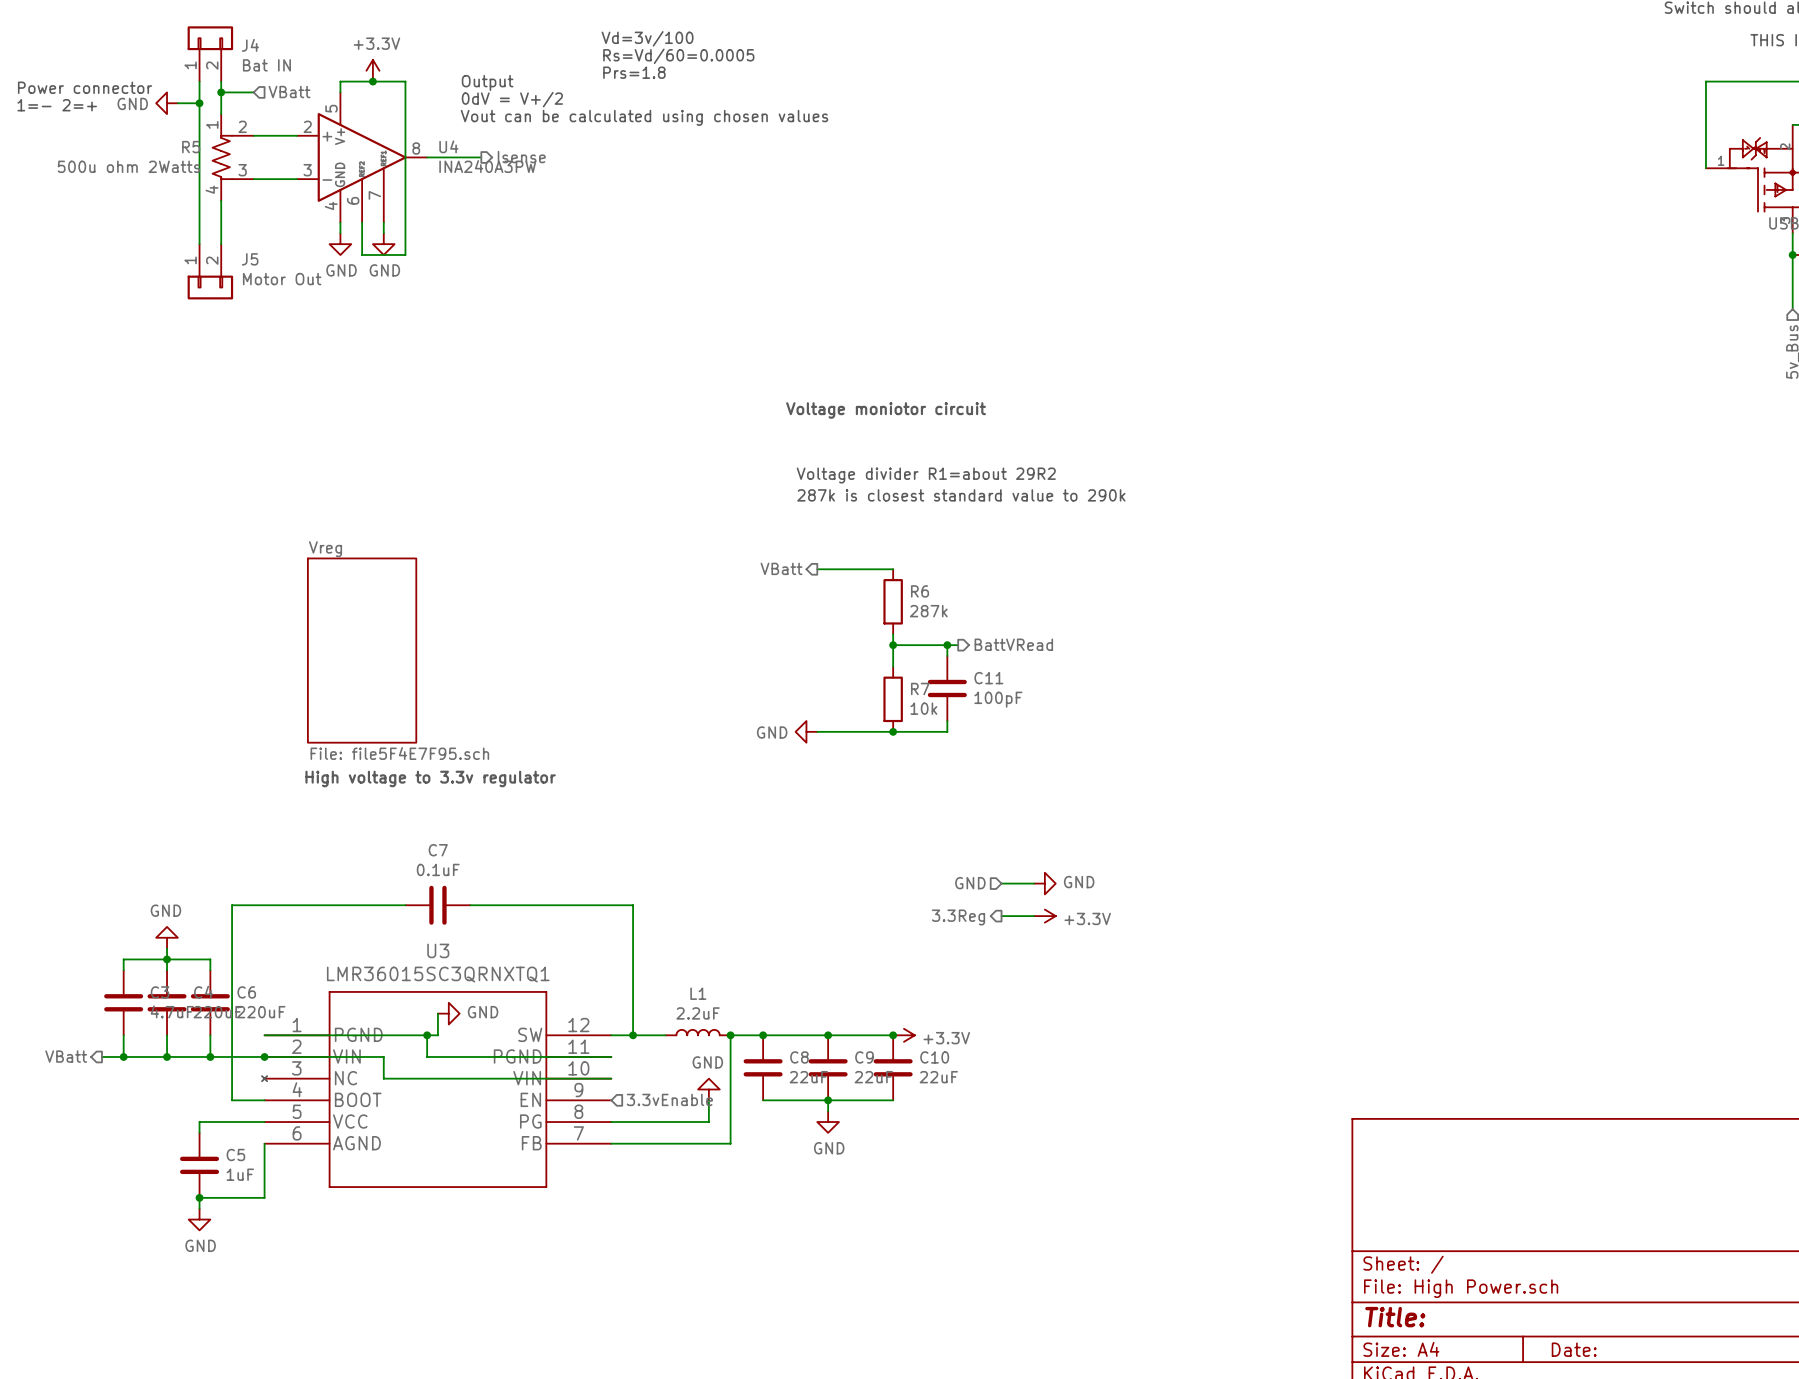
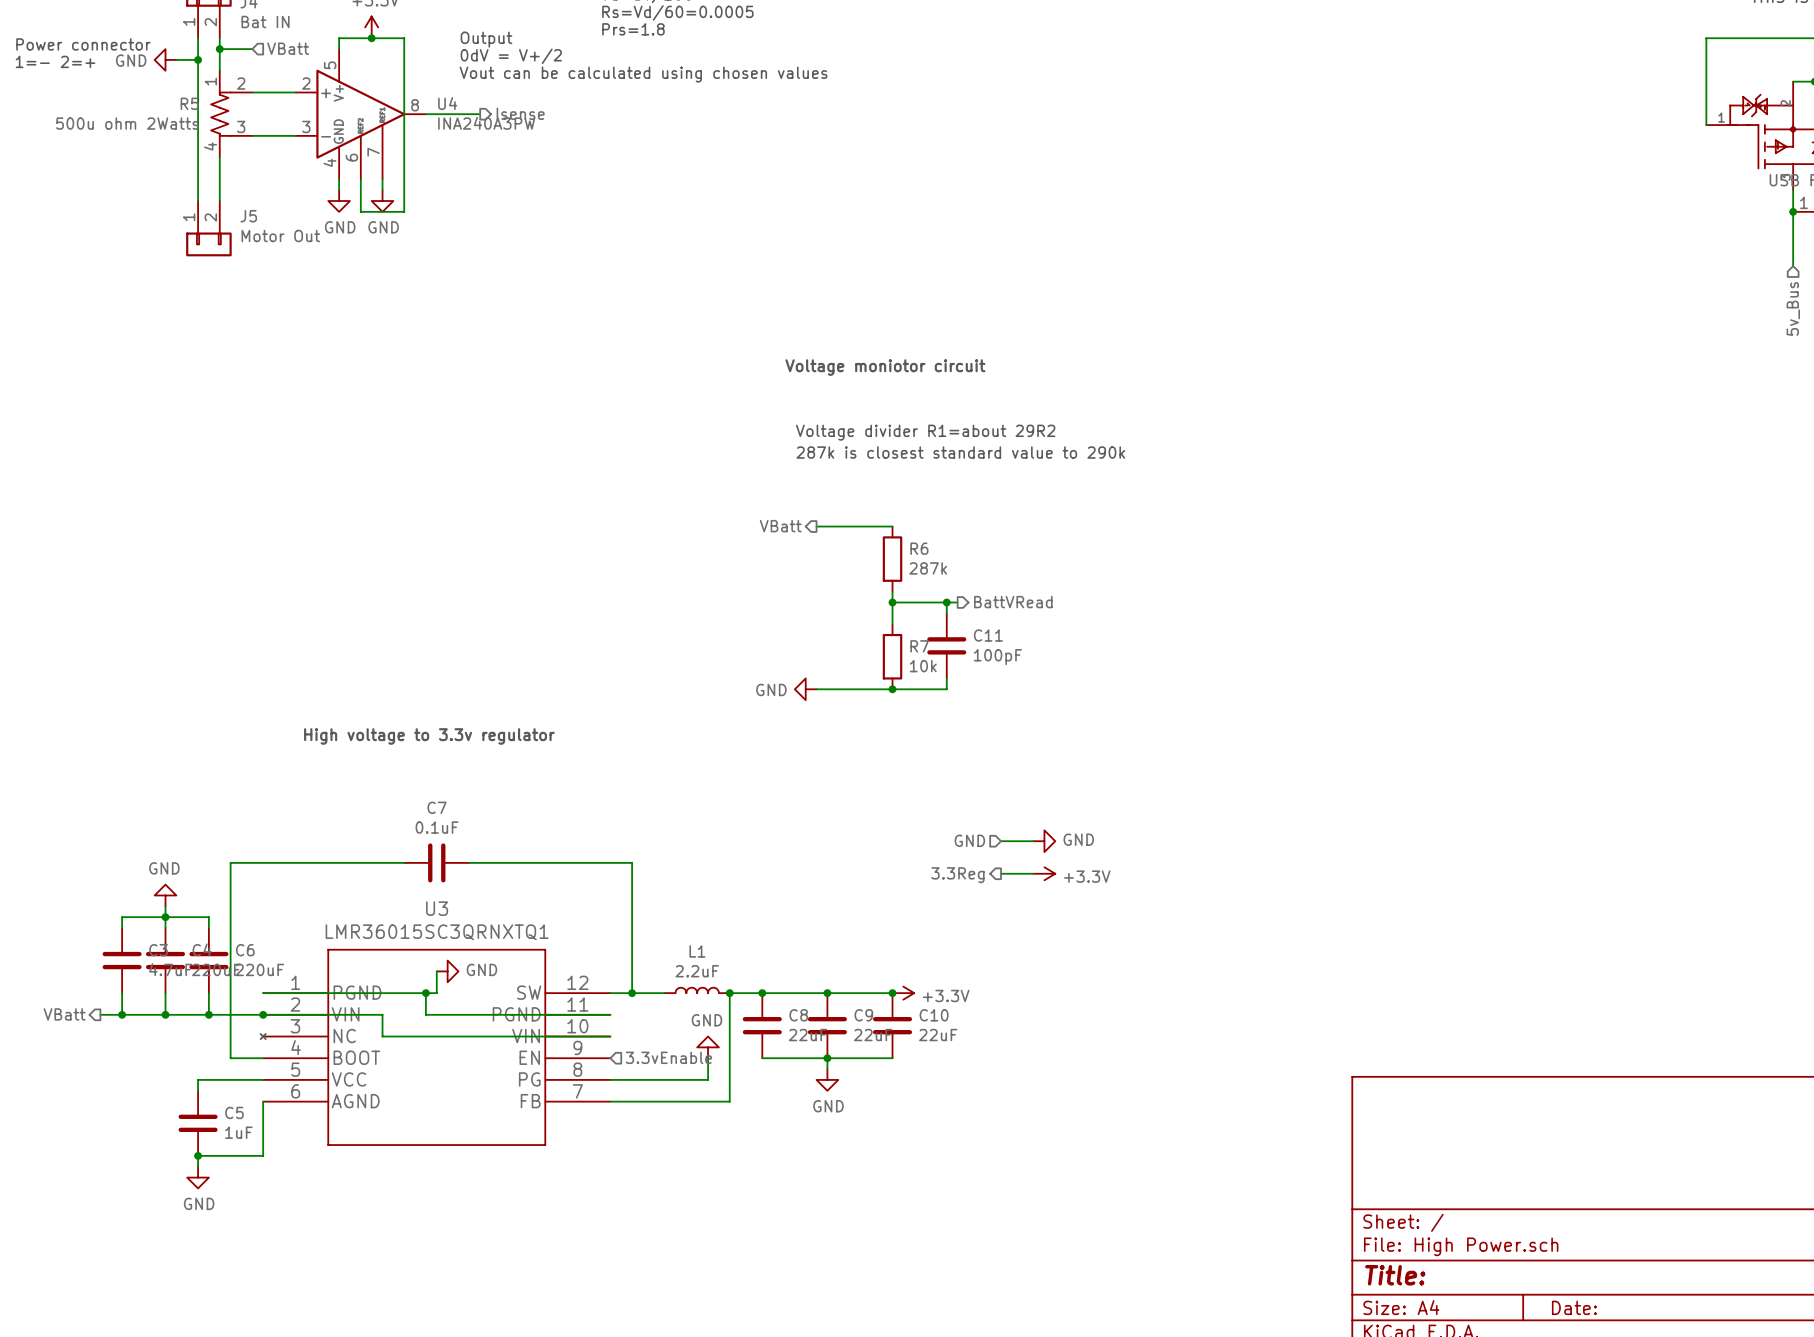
sheet Vreg: File: file5F4E7F95.sch (362, 650) -> none

